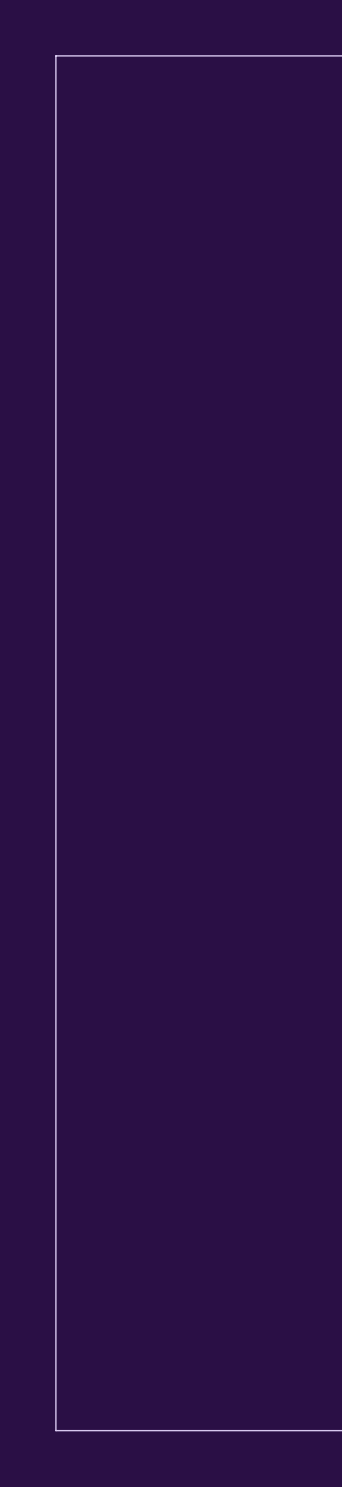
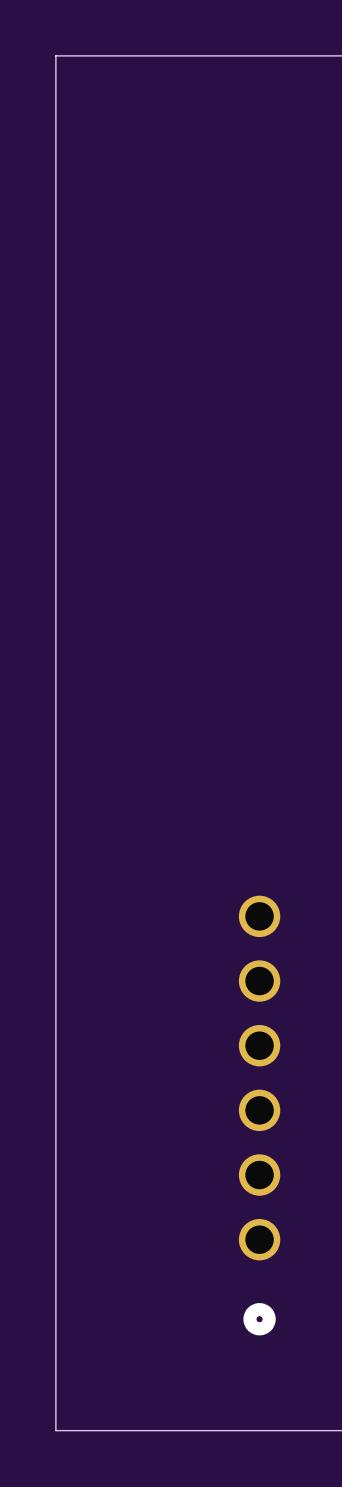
part: none -> (259, 1115)

